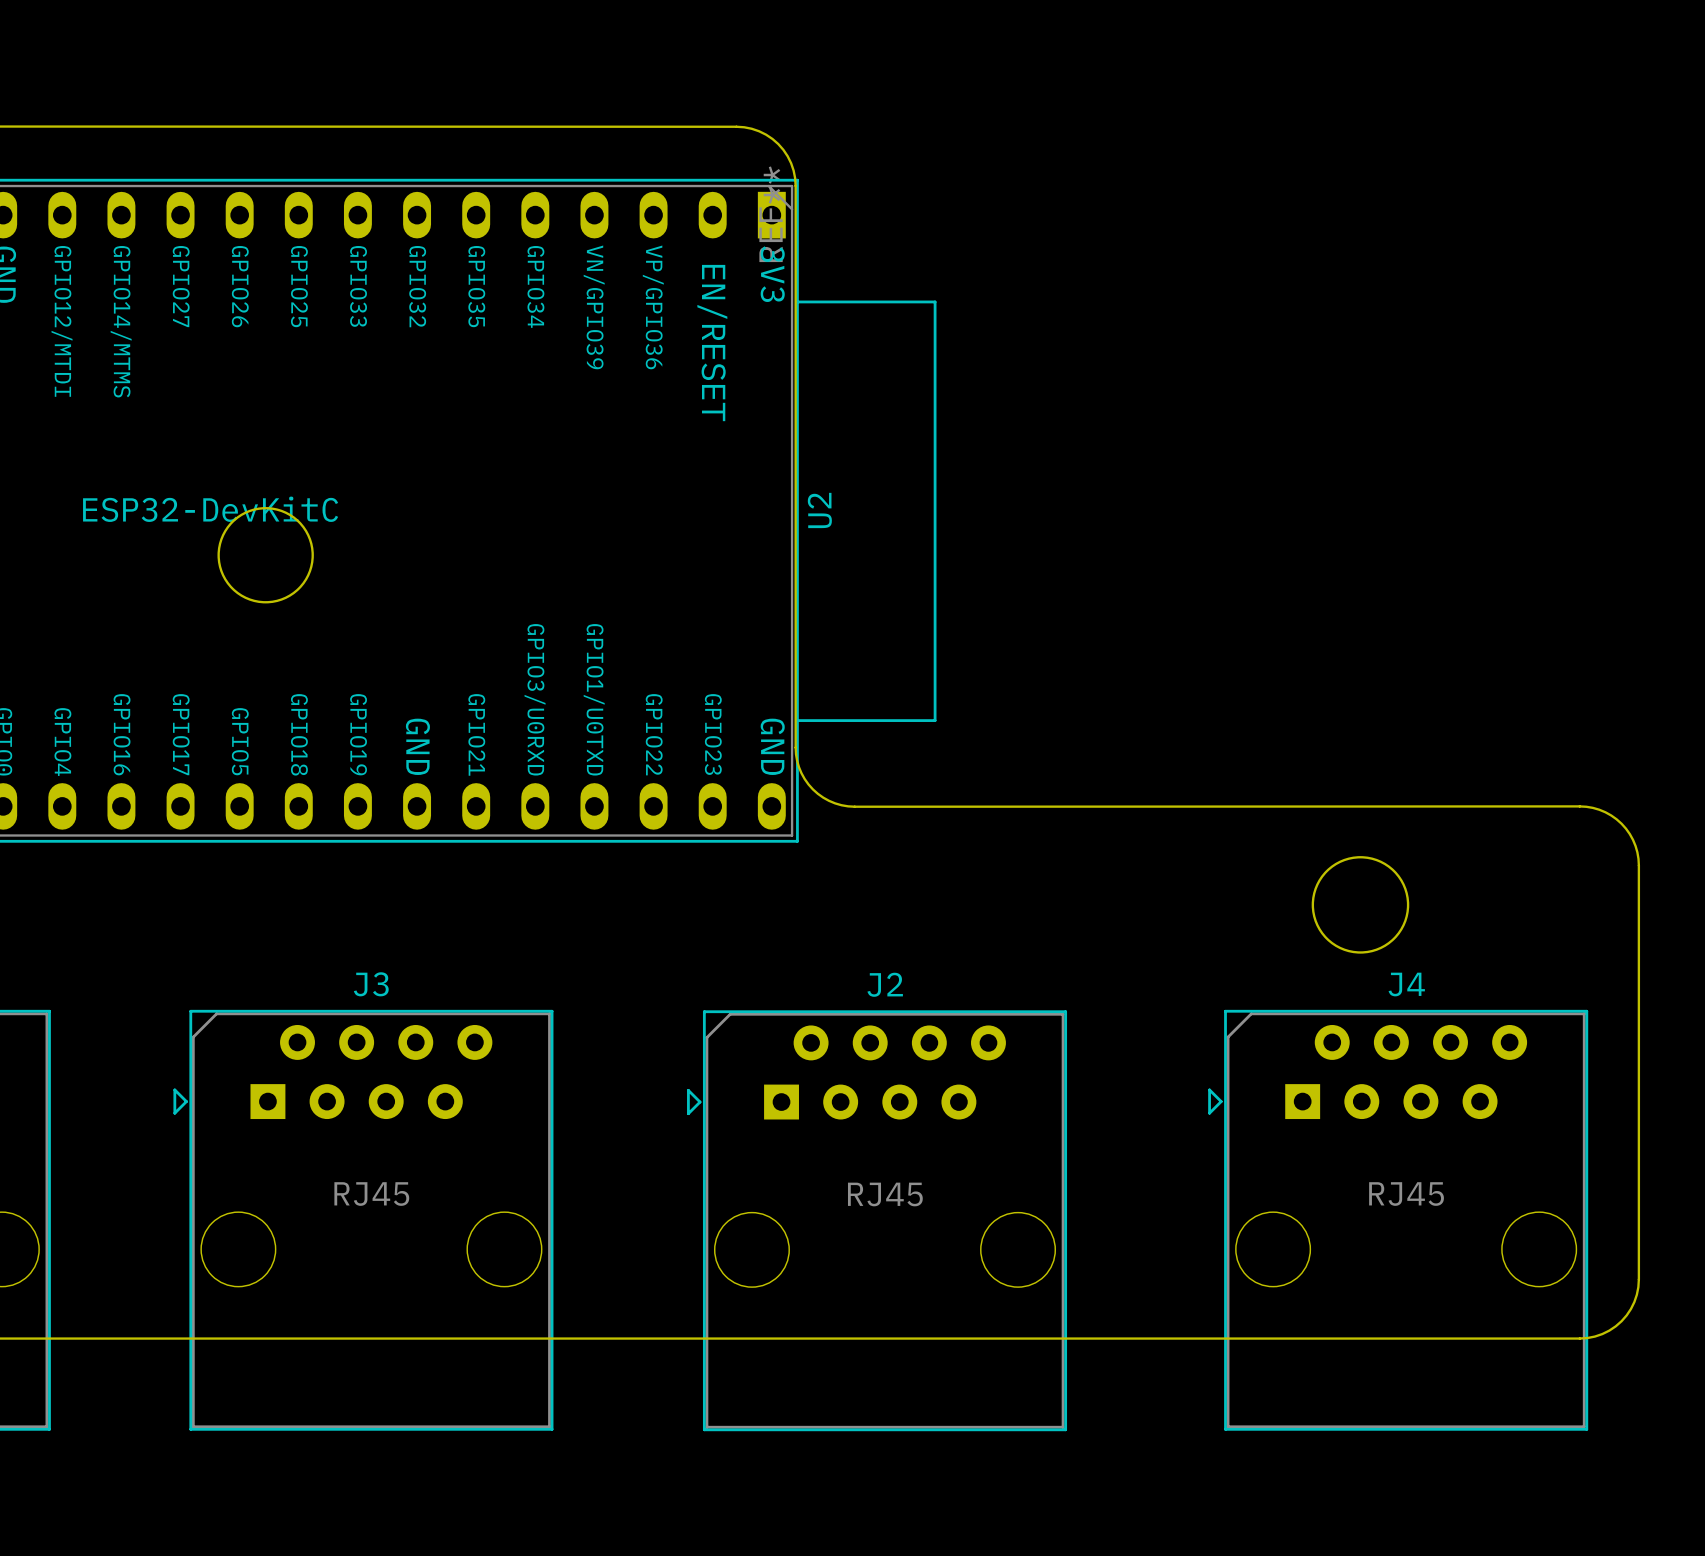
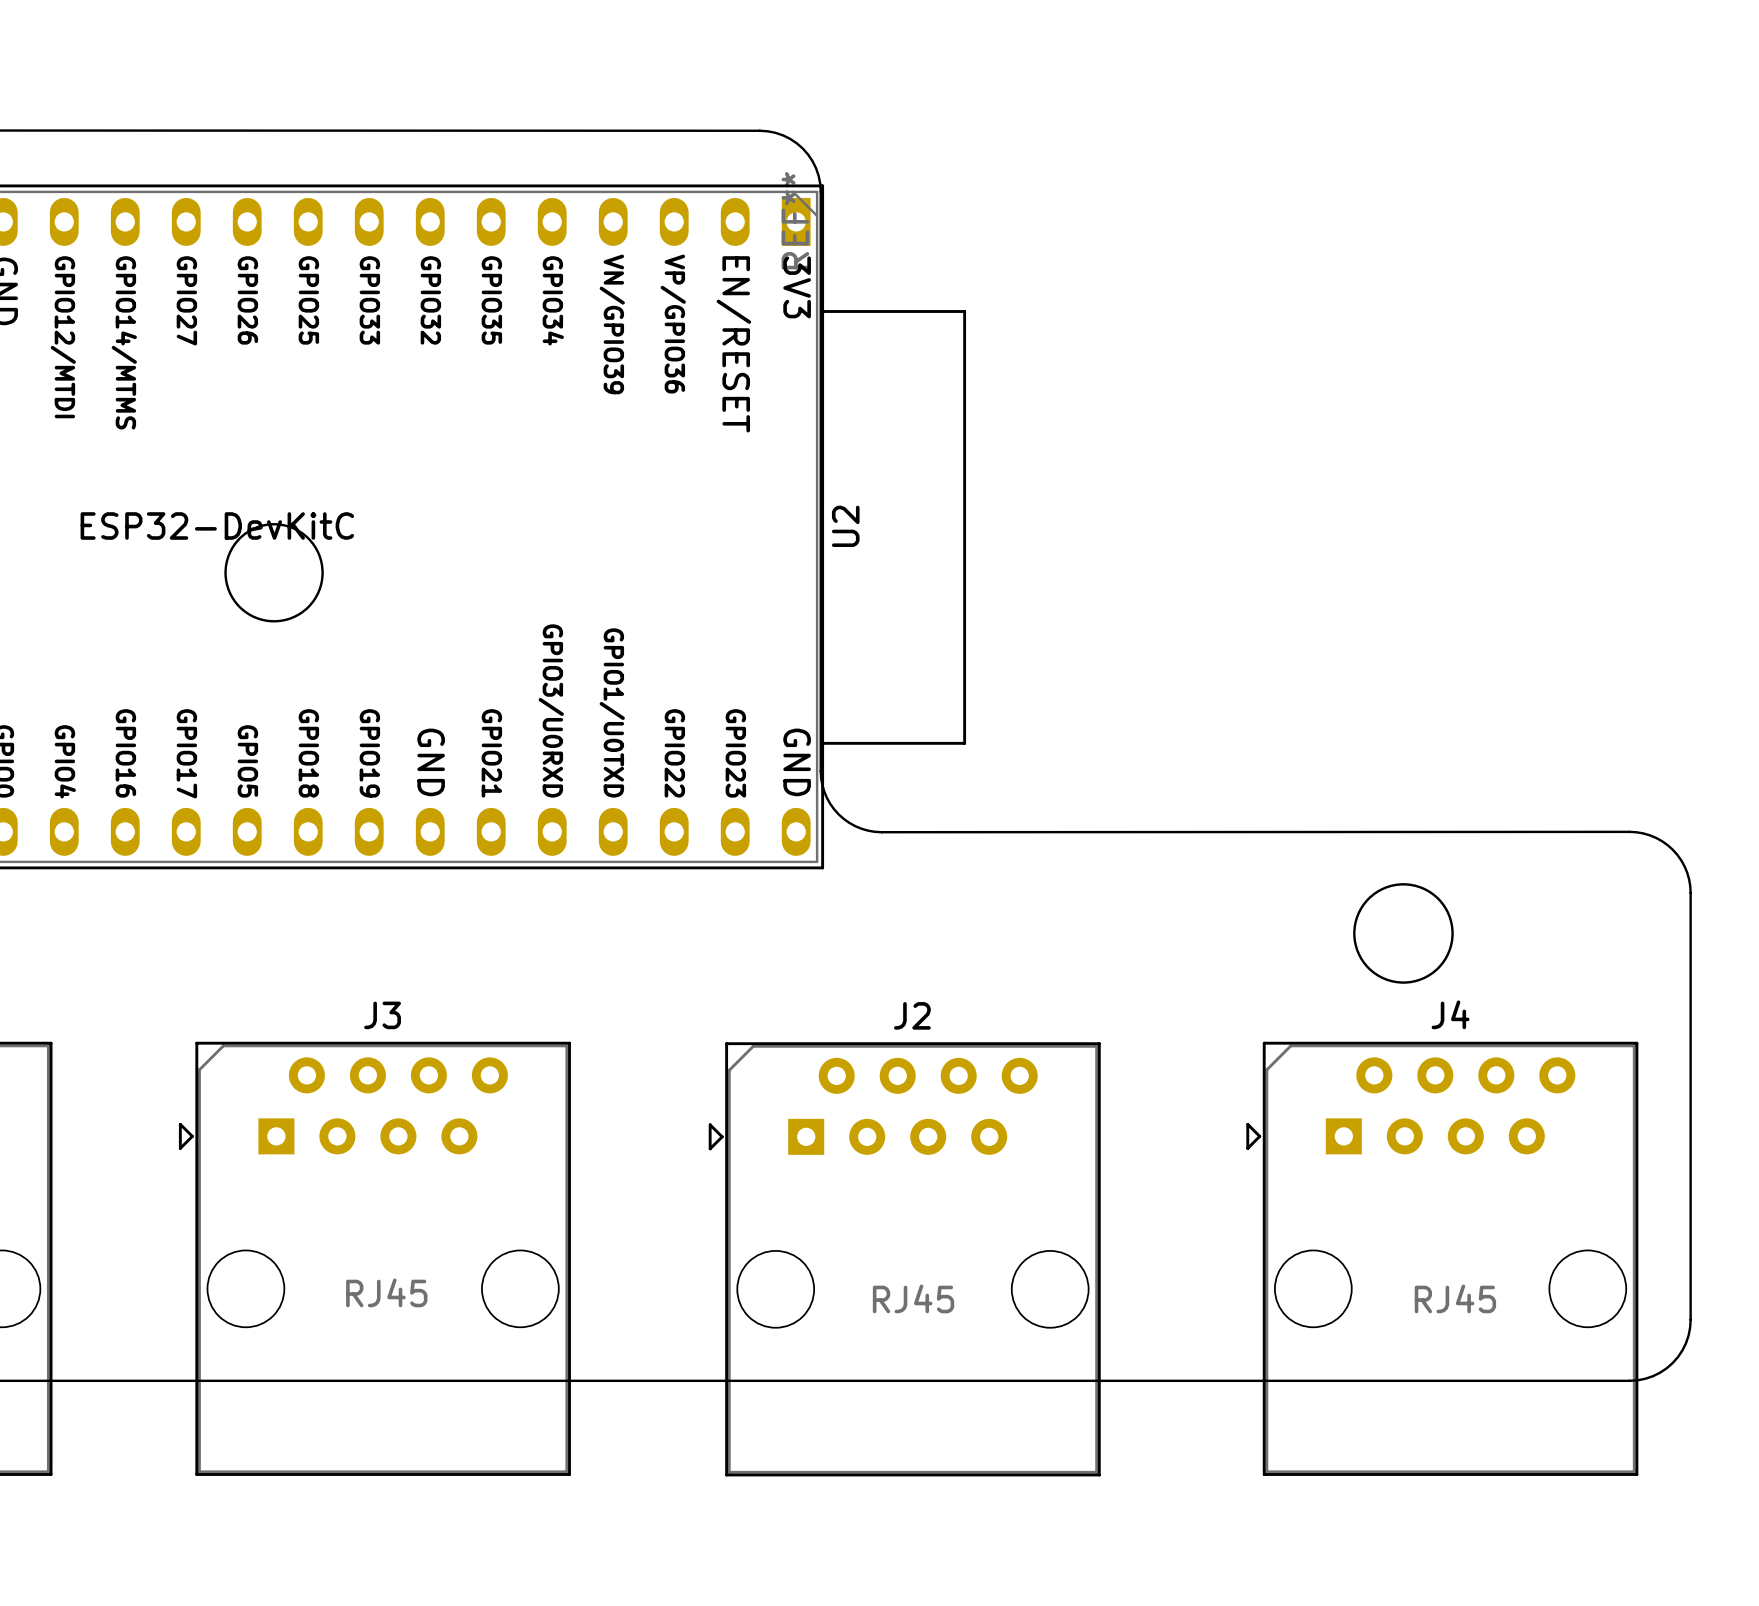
J3 value position: RJ45 (371, 1194) -> RJ45 (386, 1292)
J2 value position: RJ45 (885, 1194) -> RJ45 (913, 1298)
J4 value position: RJ45 (1406, 1194) -> RJ45 (1455, 1298)

